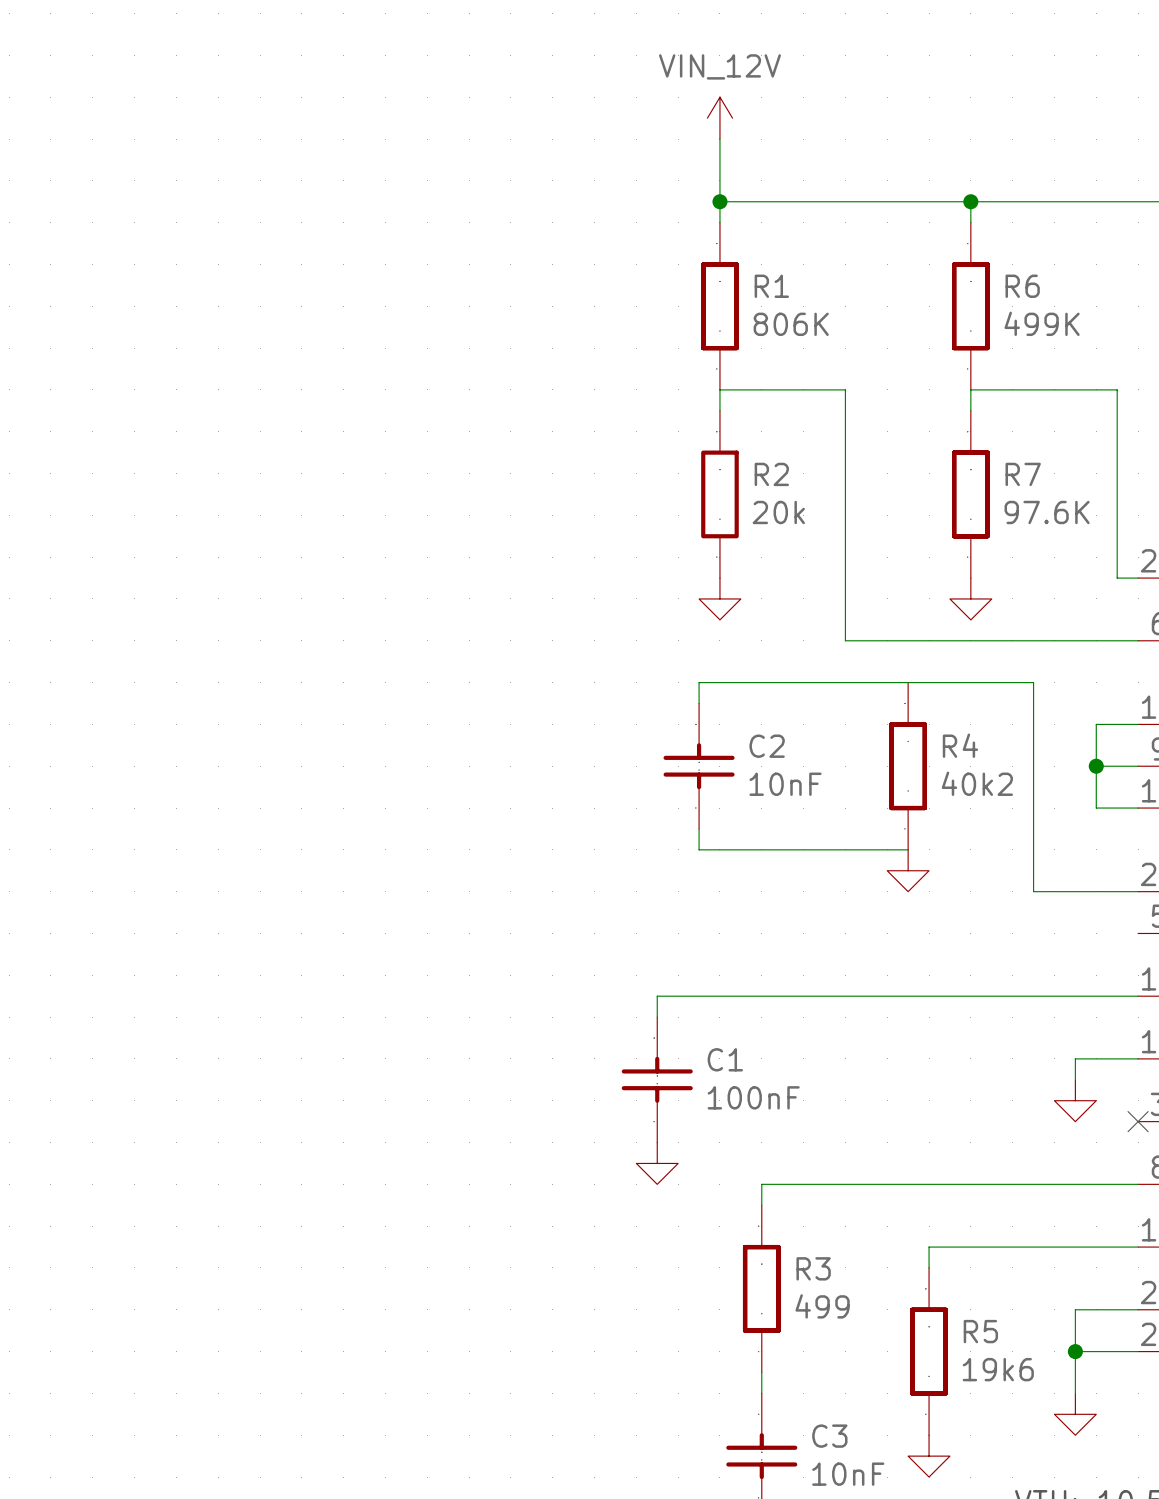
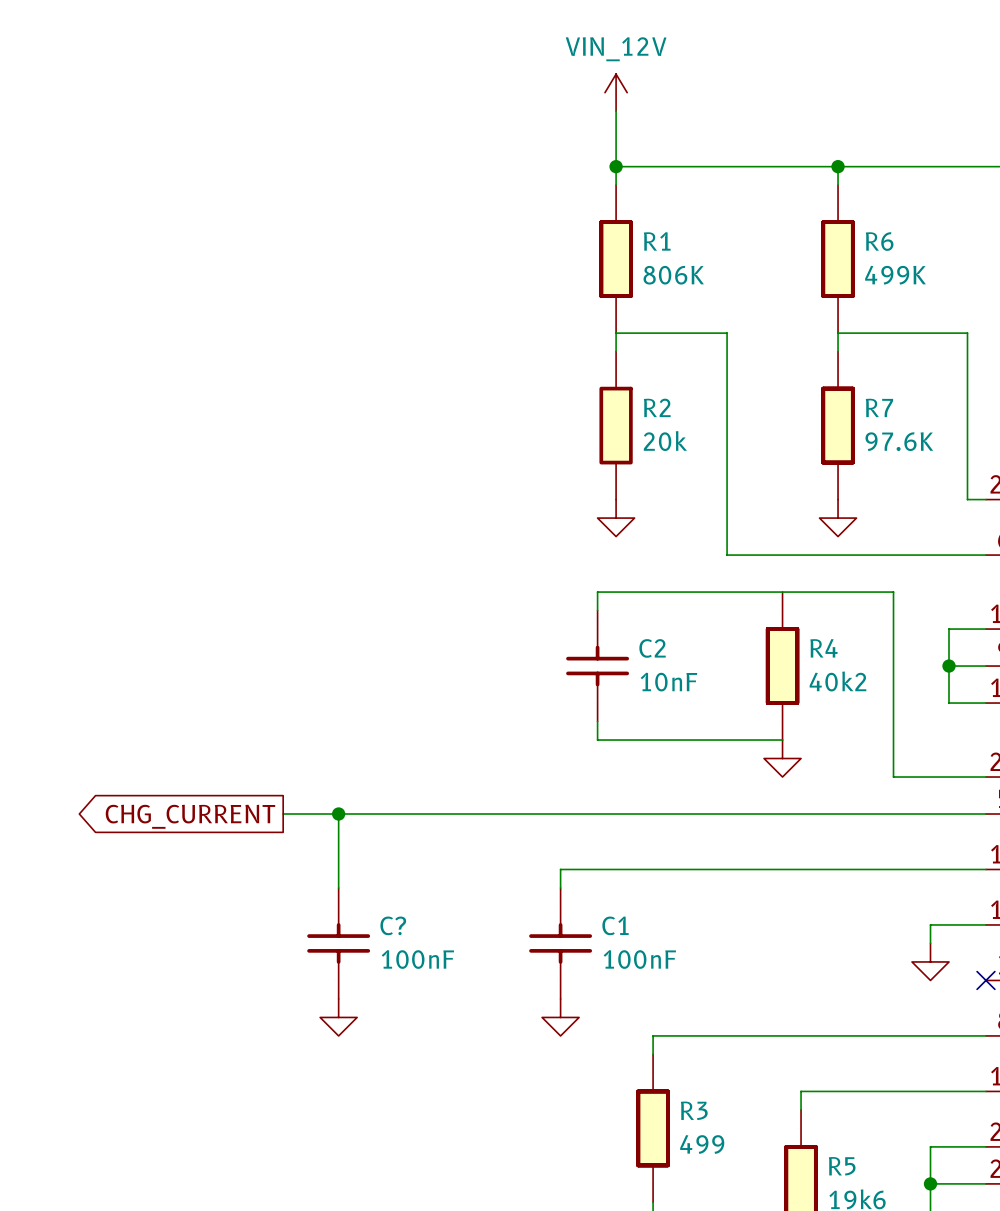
wire: none -> (283, 814) (985, 814)
wire: none -> (338, 814) (338, 887)
junction: none -> (338, 814)
global label: none -> CHG_CURRENT (190, 816)
C?: none -> (338, 943)
power symbol: none -> (338, 1017)

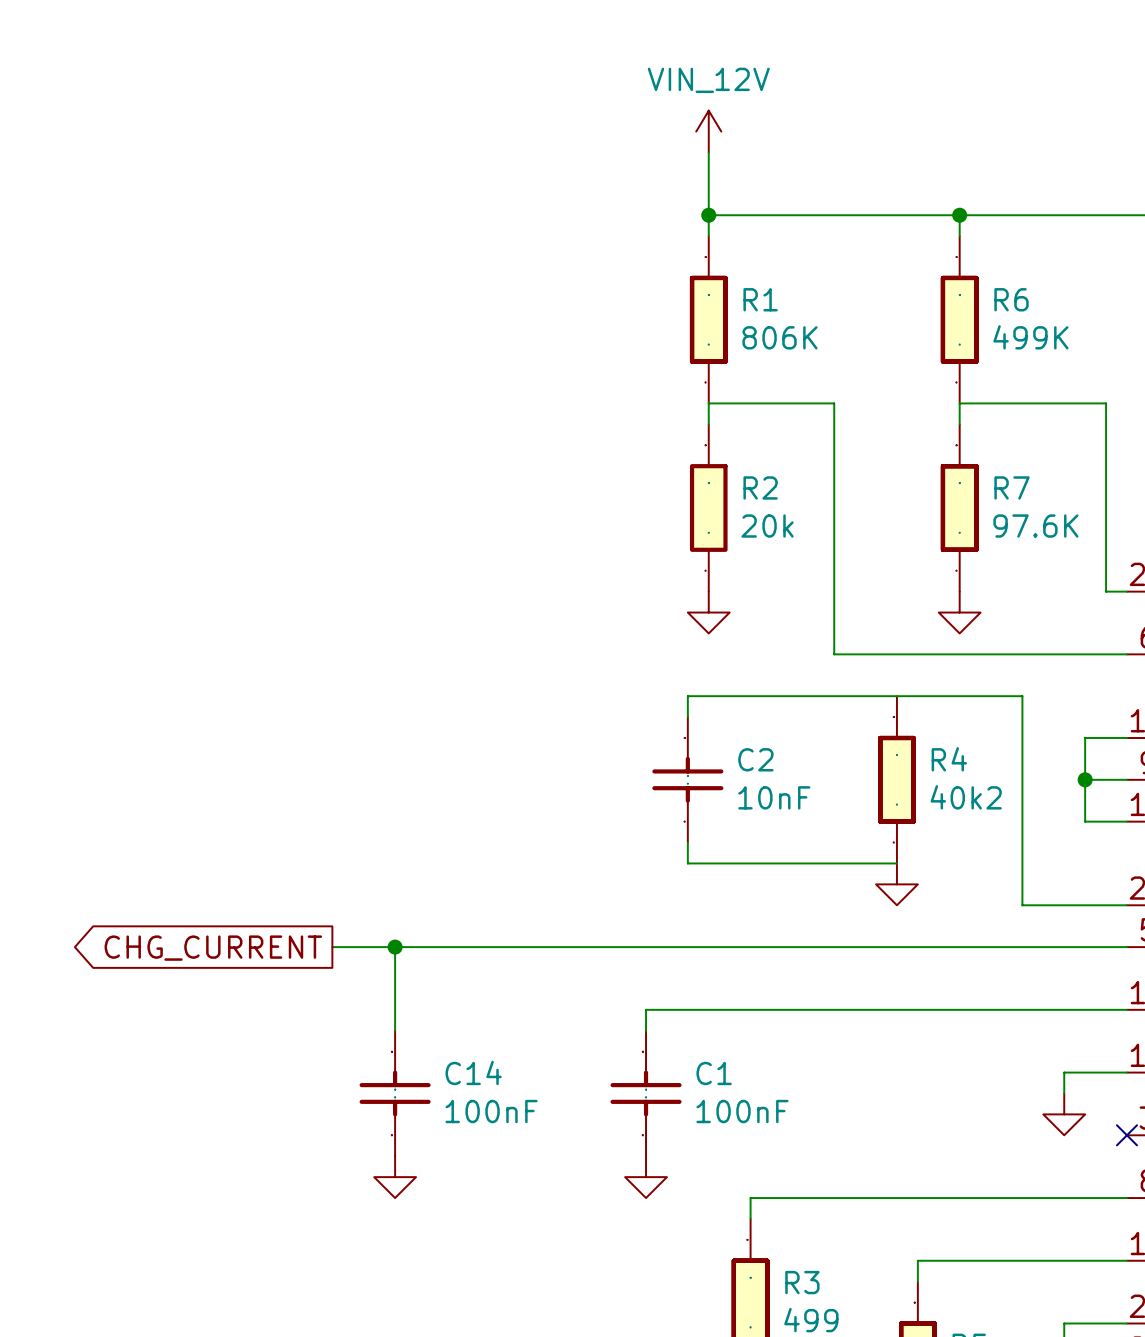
C? name: C? (393, 925) -> C14 (473, 1072)

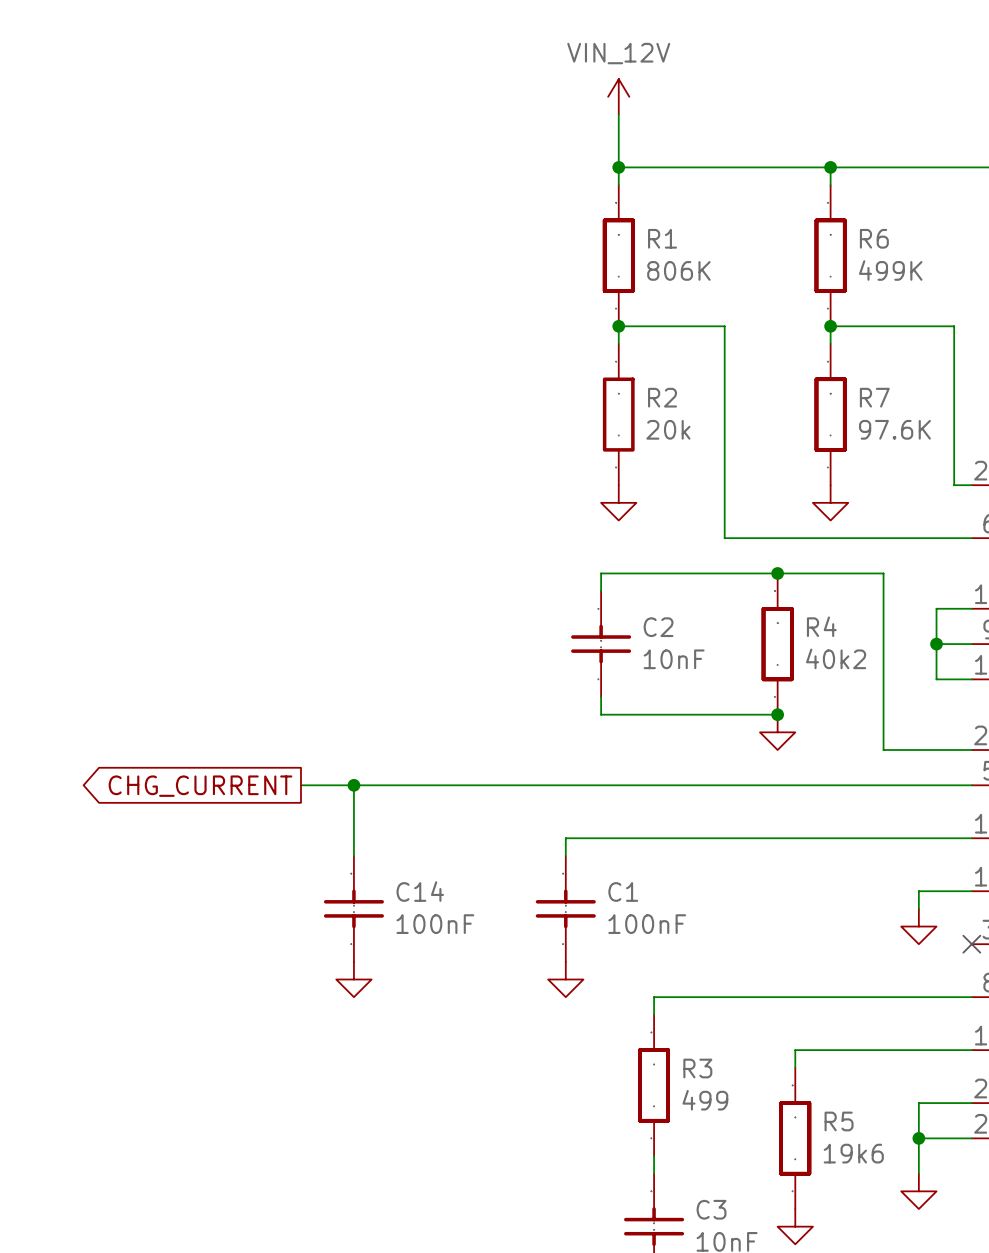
junction: none -> (618, 326)
junction: none -> (830, 326)
junction: none -> (777, 573)
junction: none -> (777, 714)

